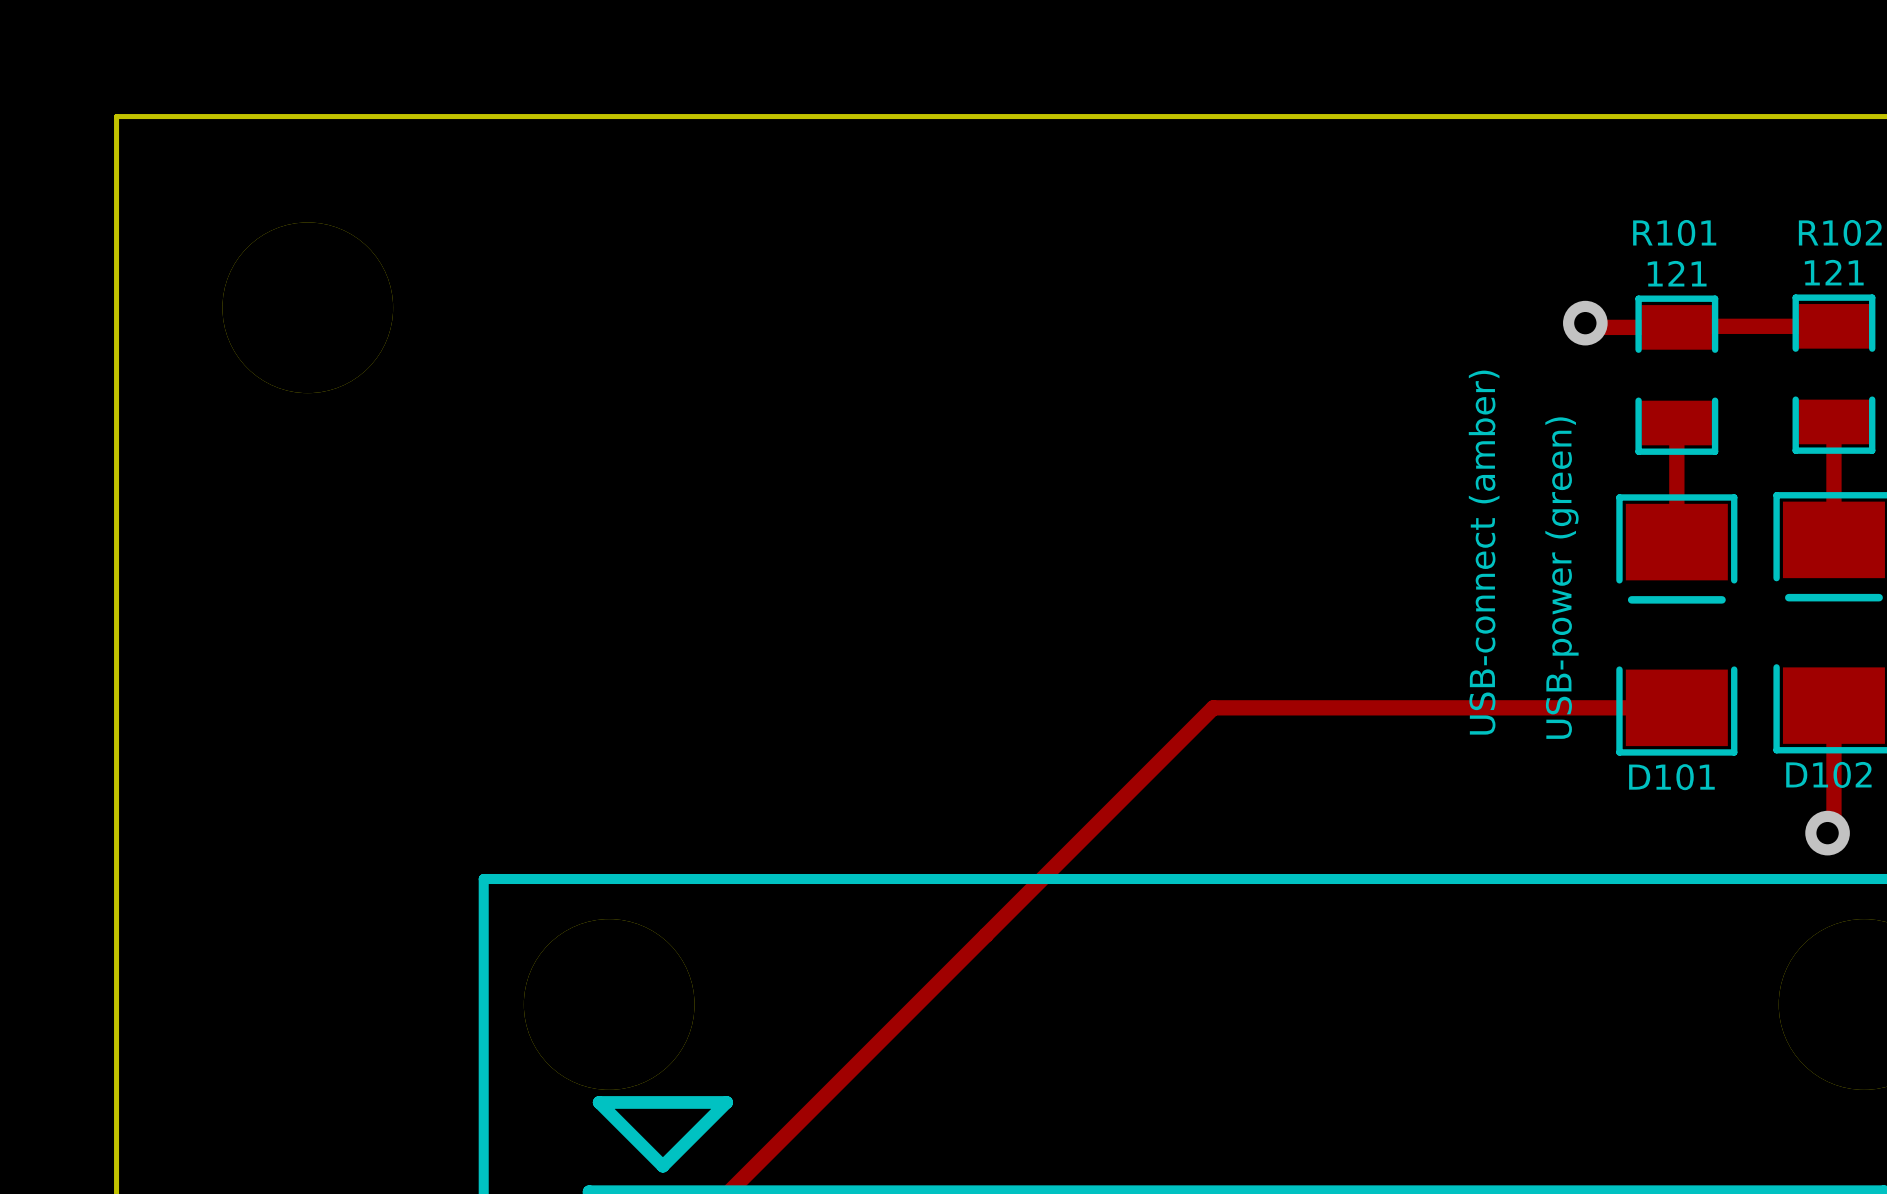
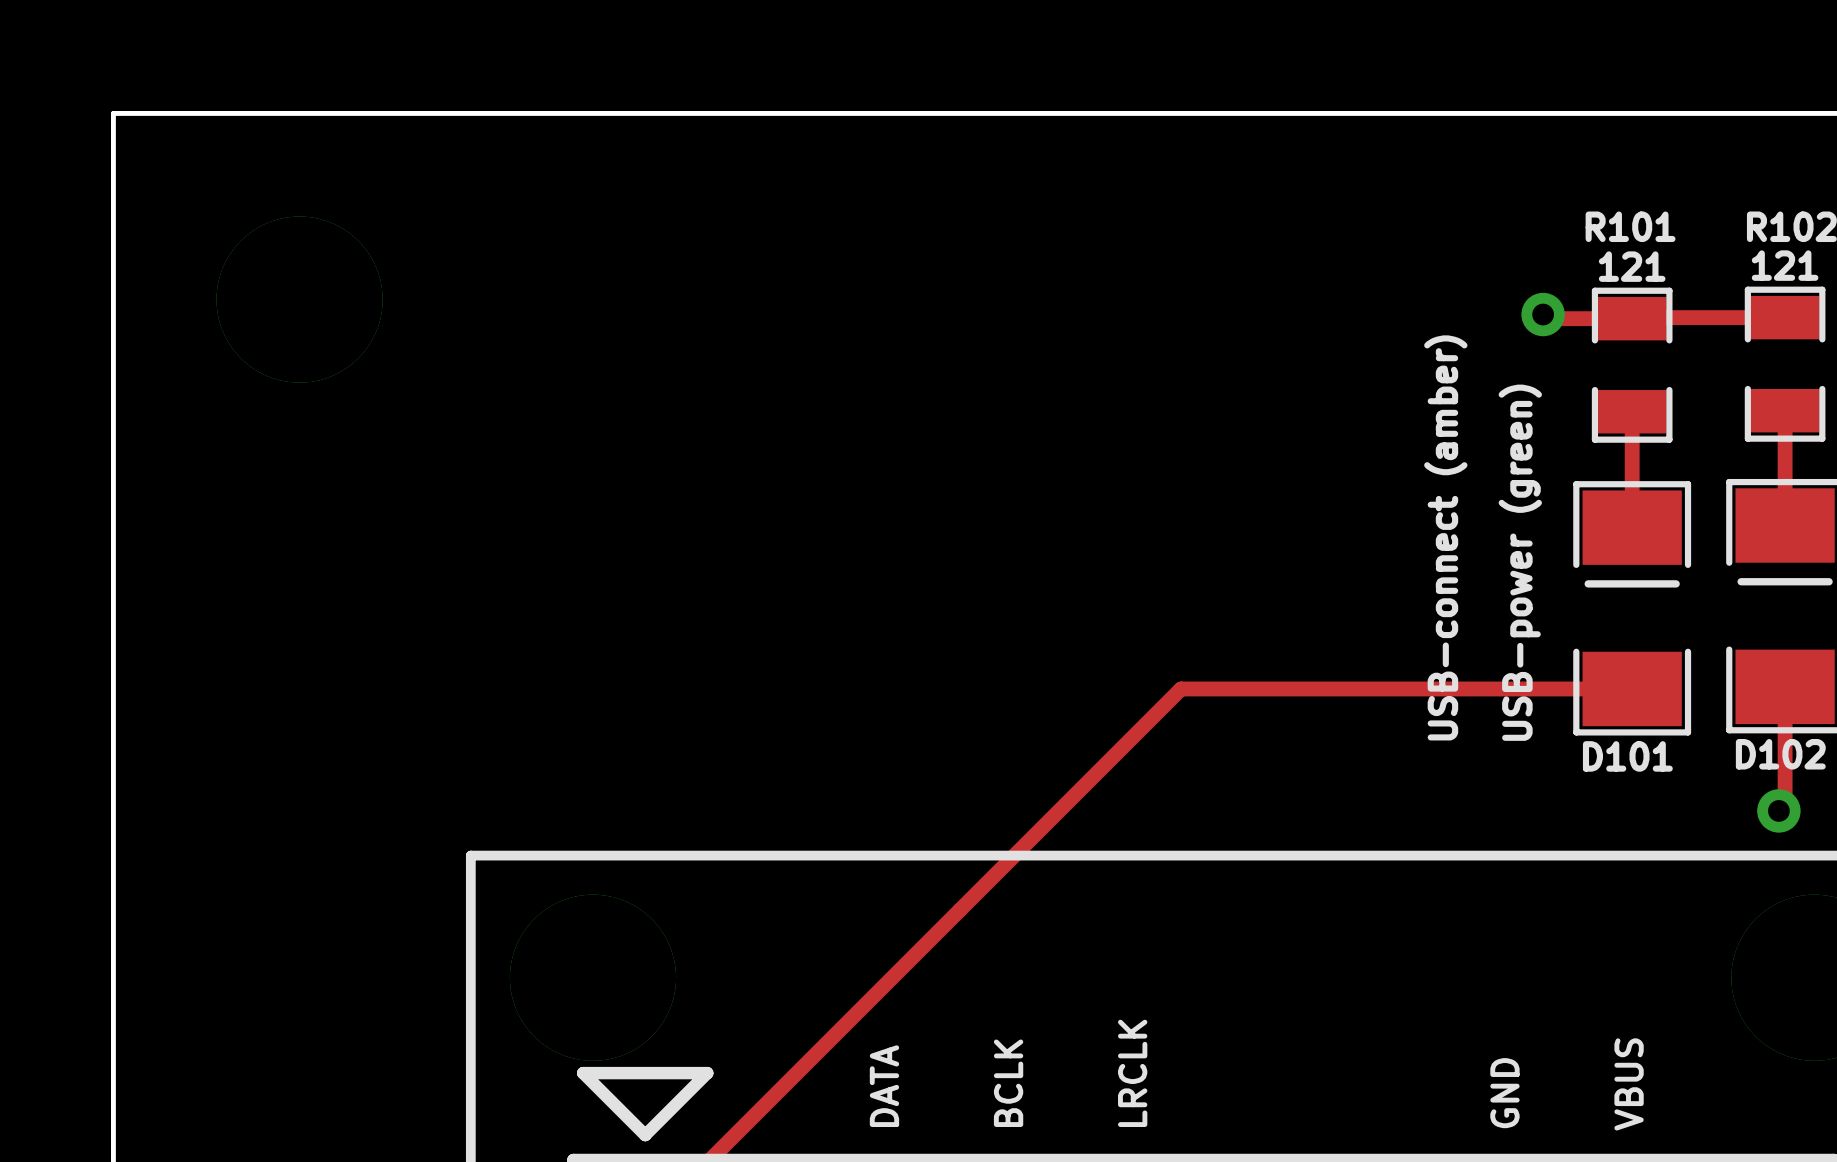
text: none -> LRCLK (1132, 1073)
text: none -> DATA (884, 1086)
text: none -> BCLK (1008, 1083)
text: none -> VBUS (1629, 1084)
text: none -> GND (1504, 1093)

